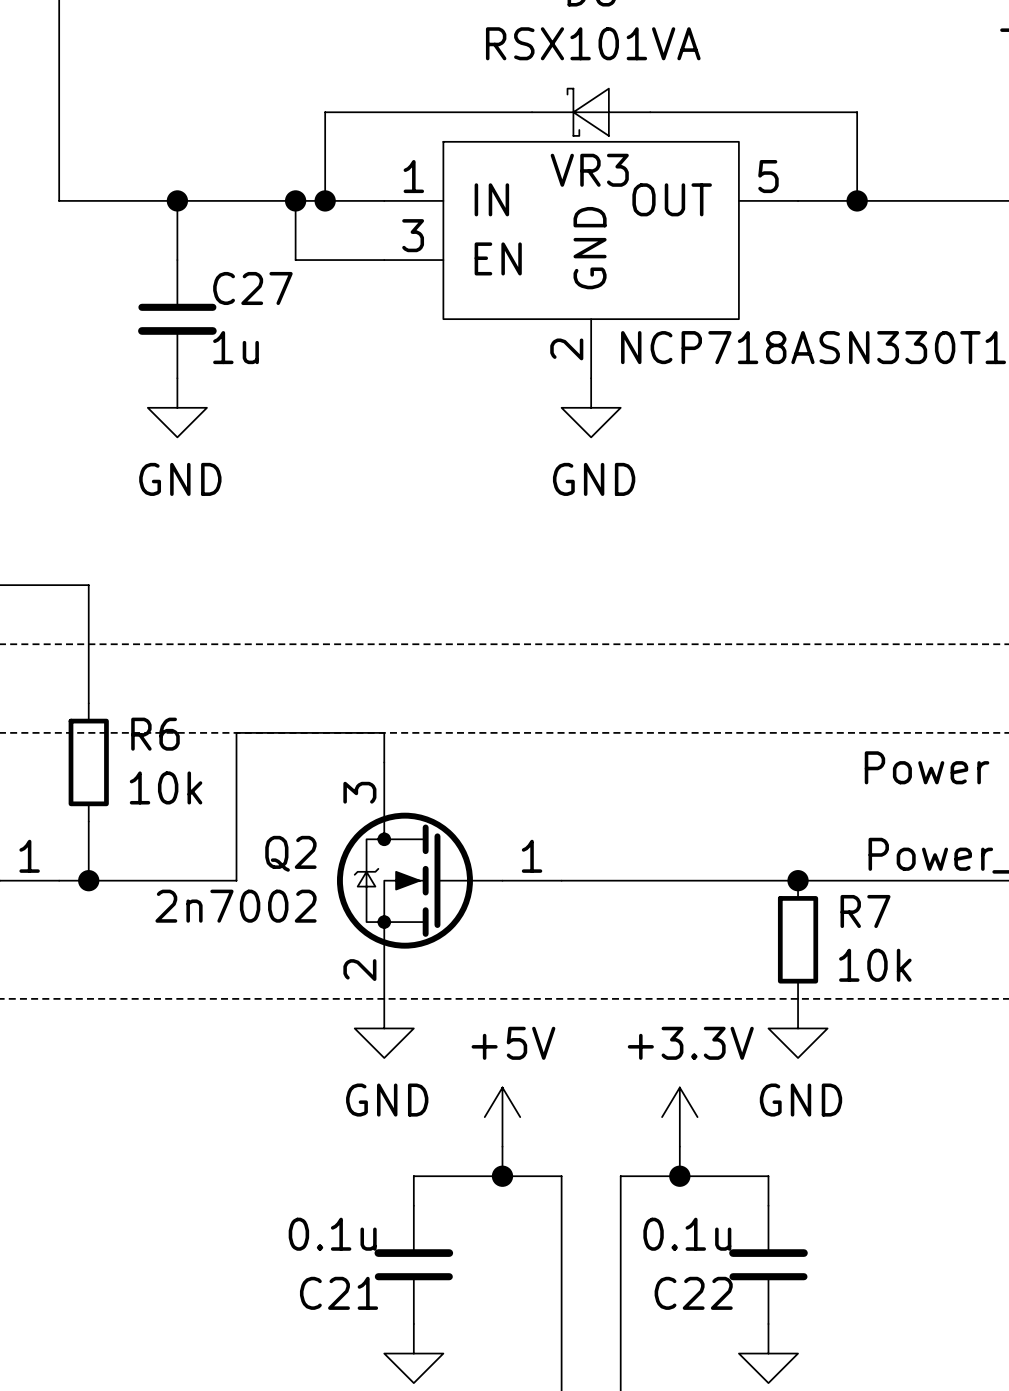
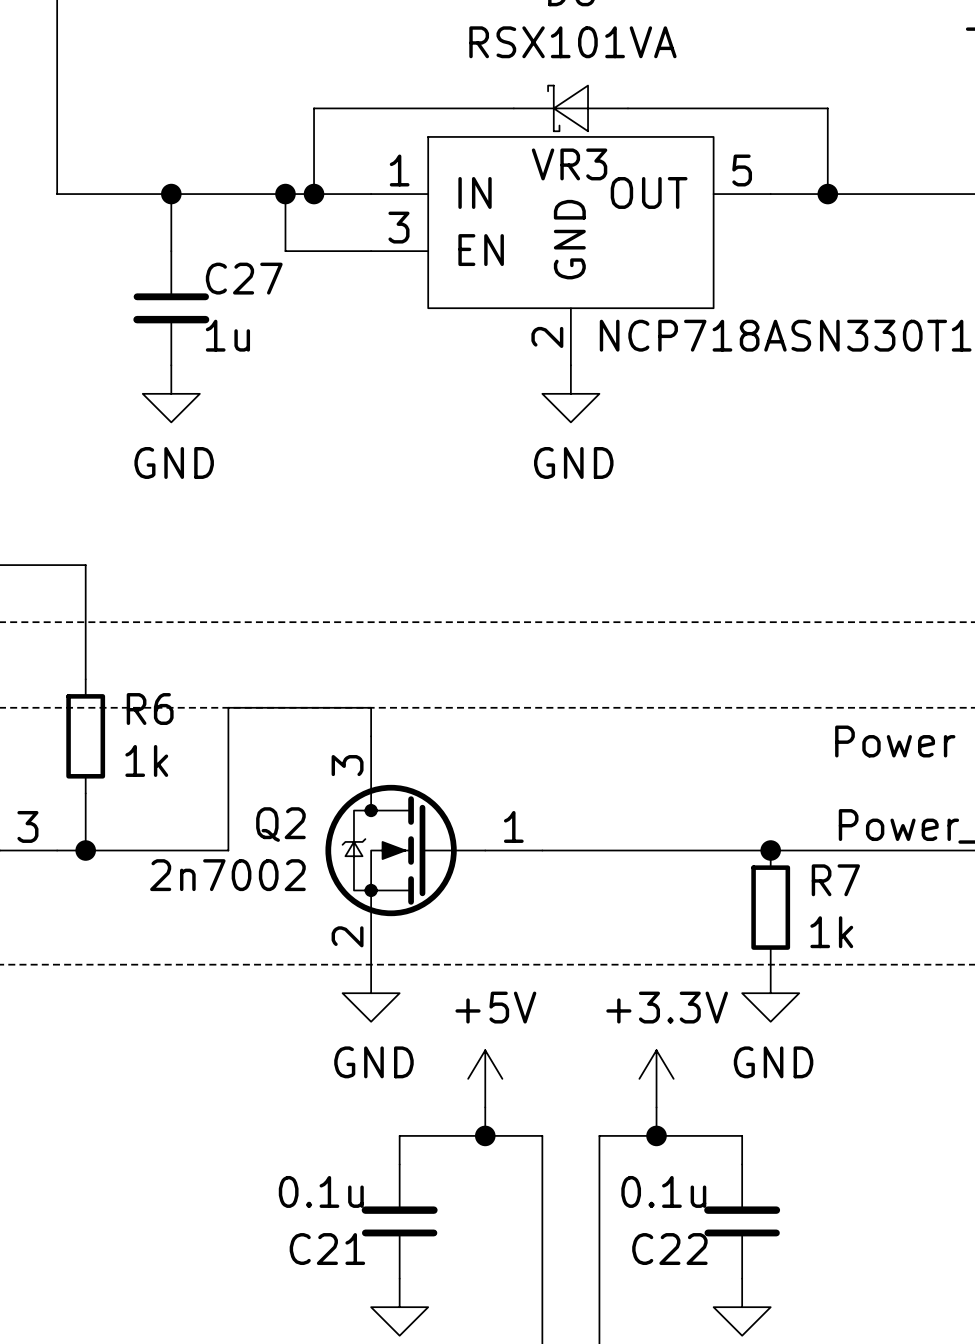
R6 value: 10k (166, 787) -> 1k (146, 760)
part pin number: 1 (29, 856) -> 3 (27, 826)
R7 value: 10k (875, 965) -> 1k (831, 932)

